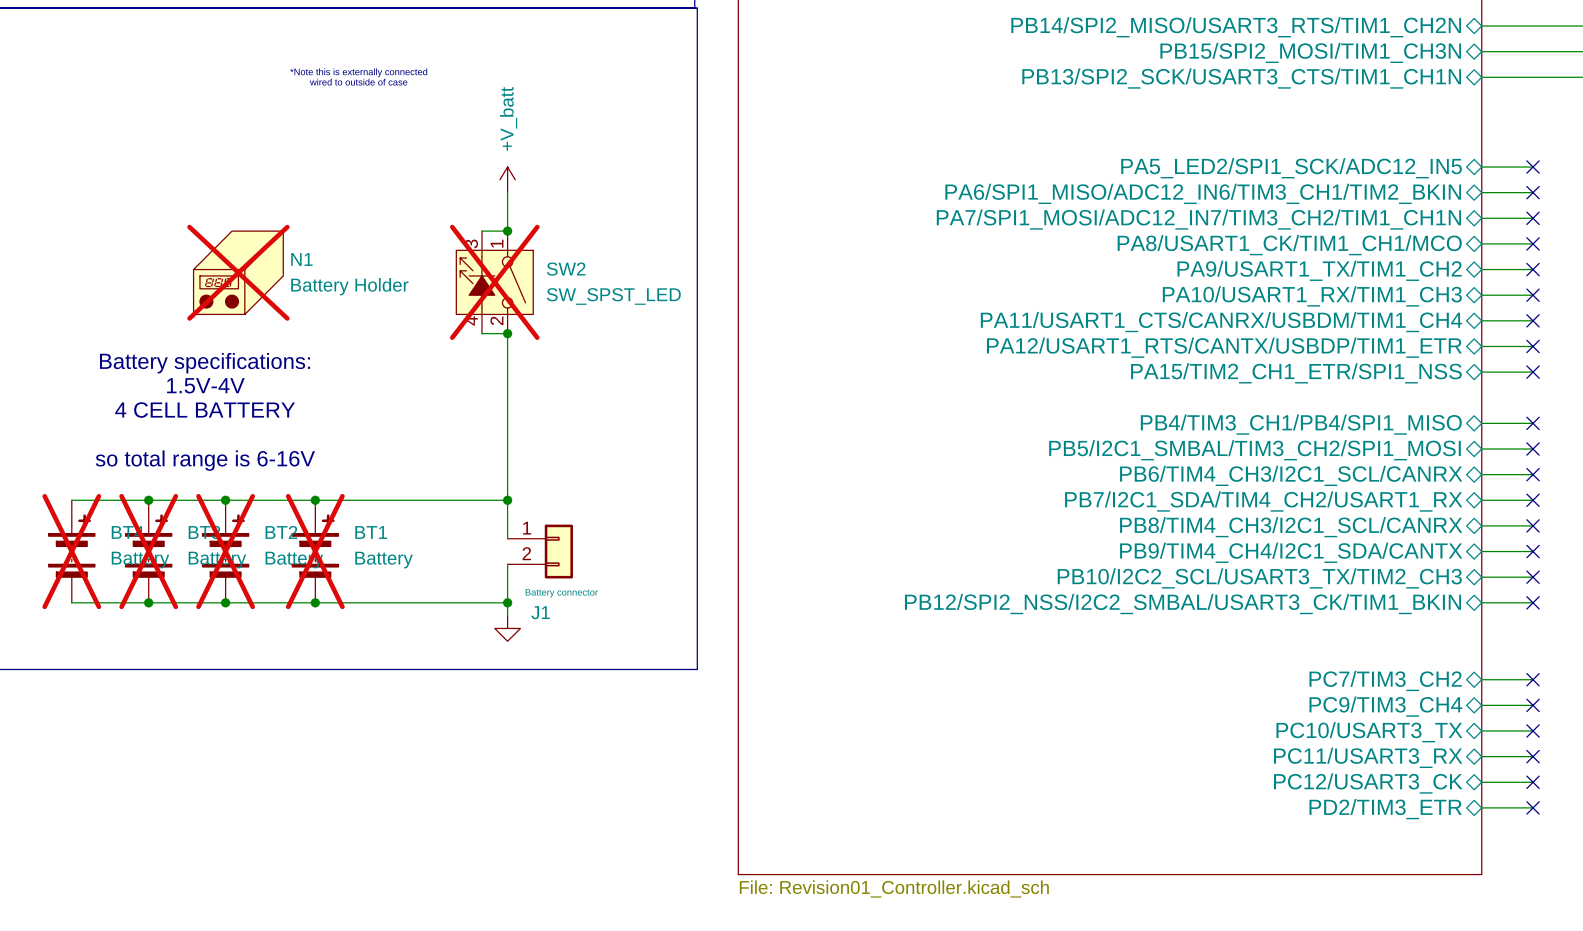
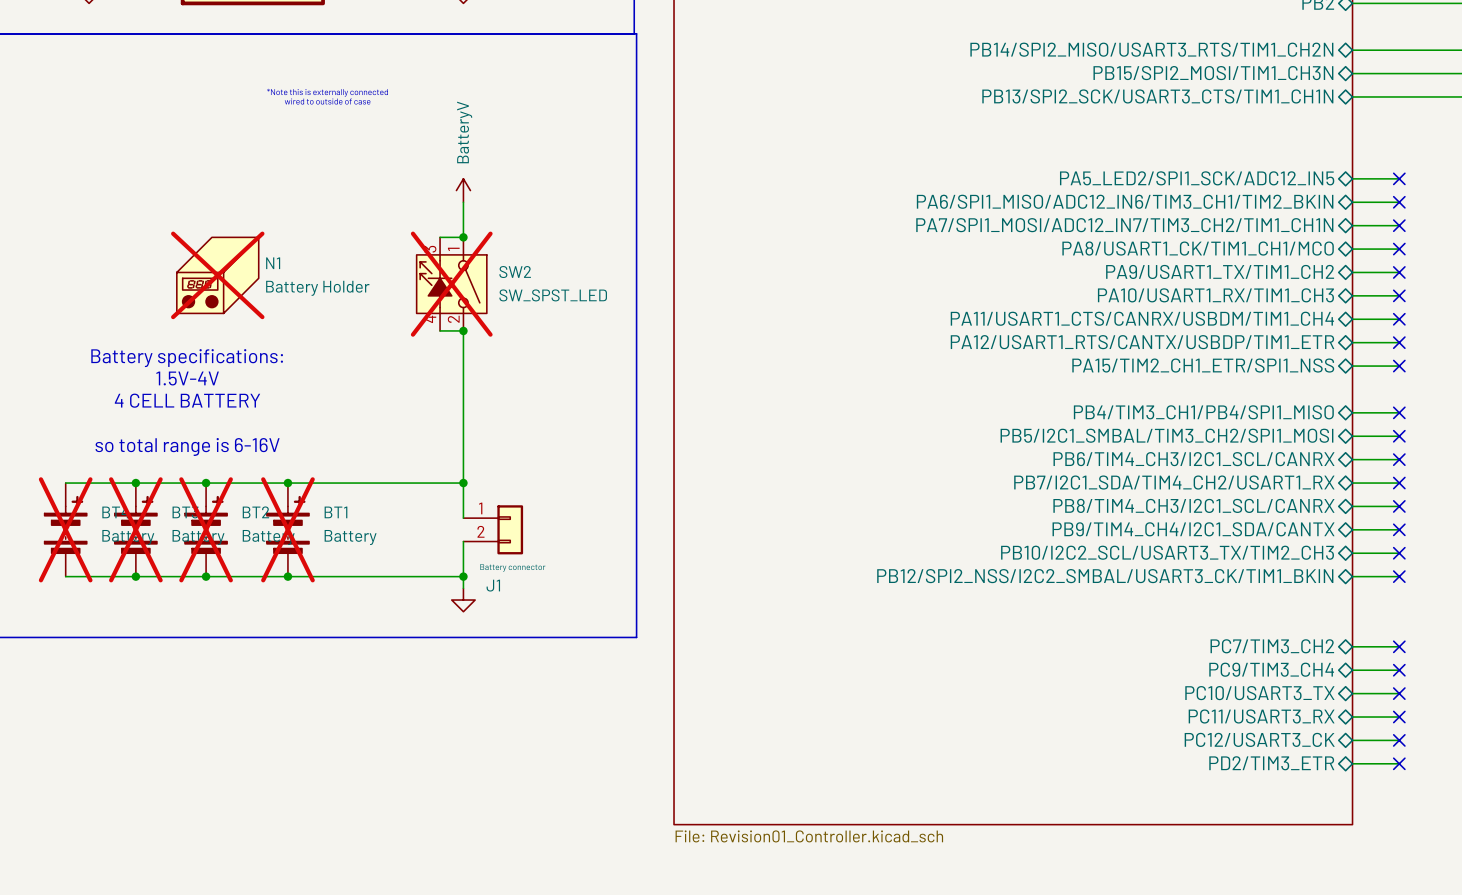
power symbol: +V_batt (507, 179) -> BatteryV (463, 190)

